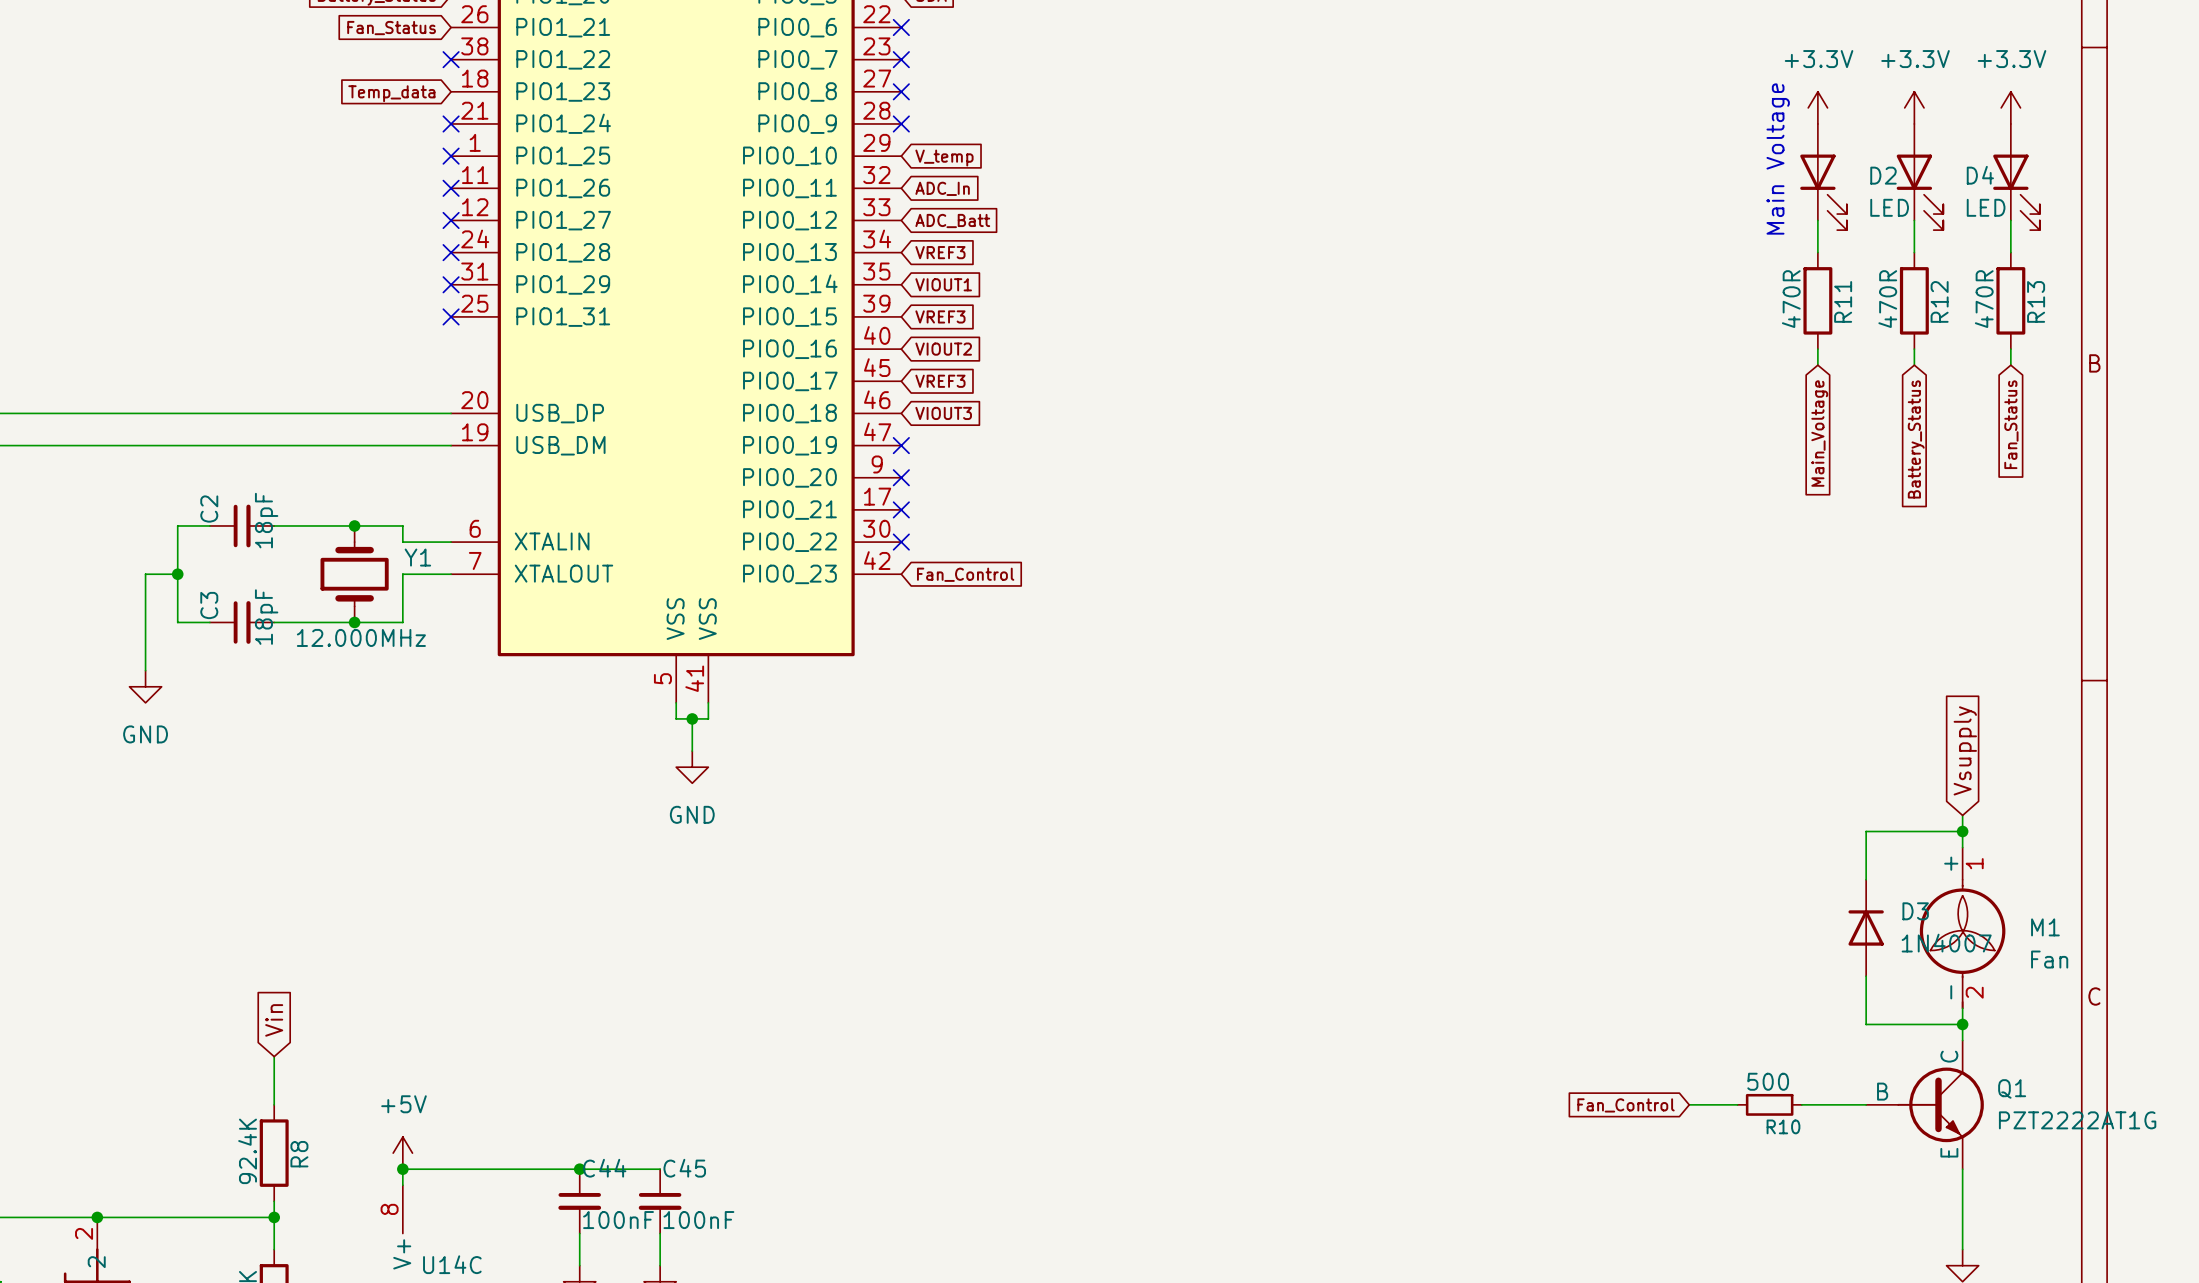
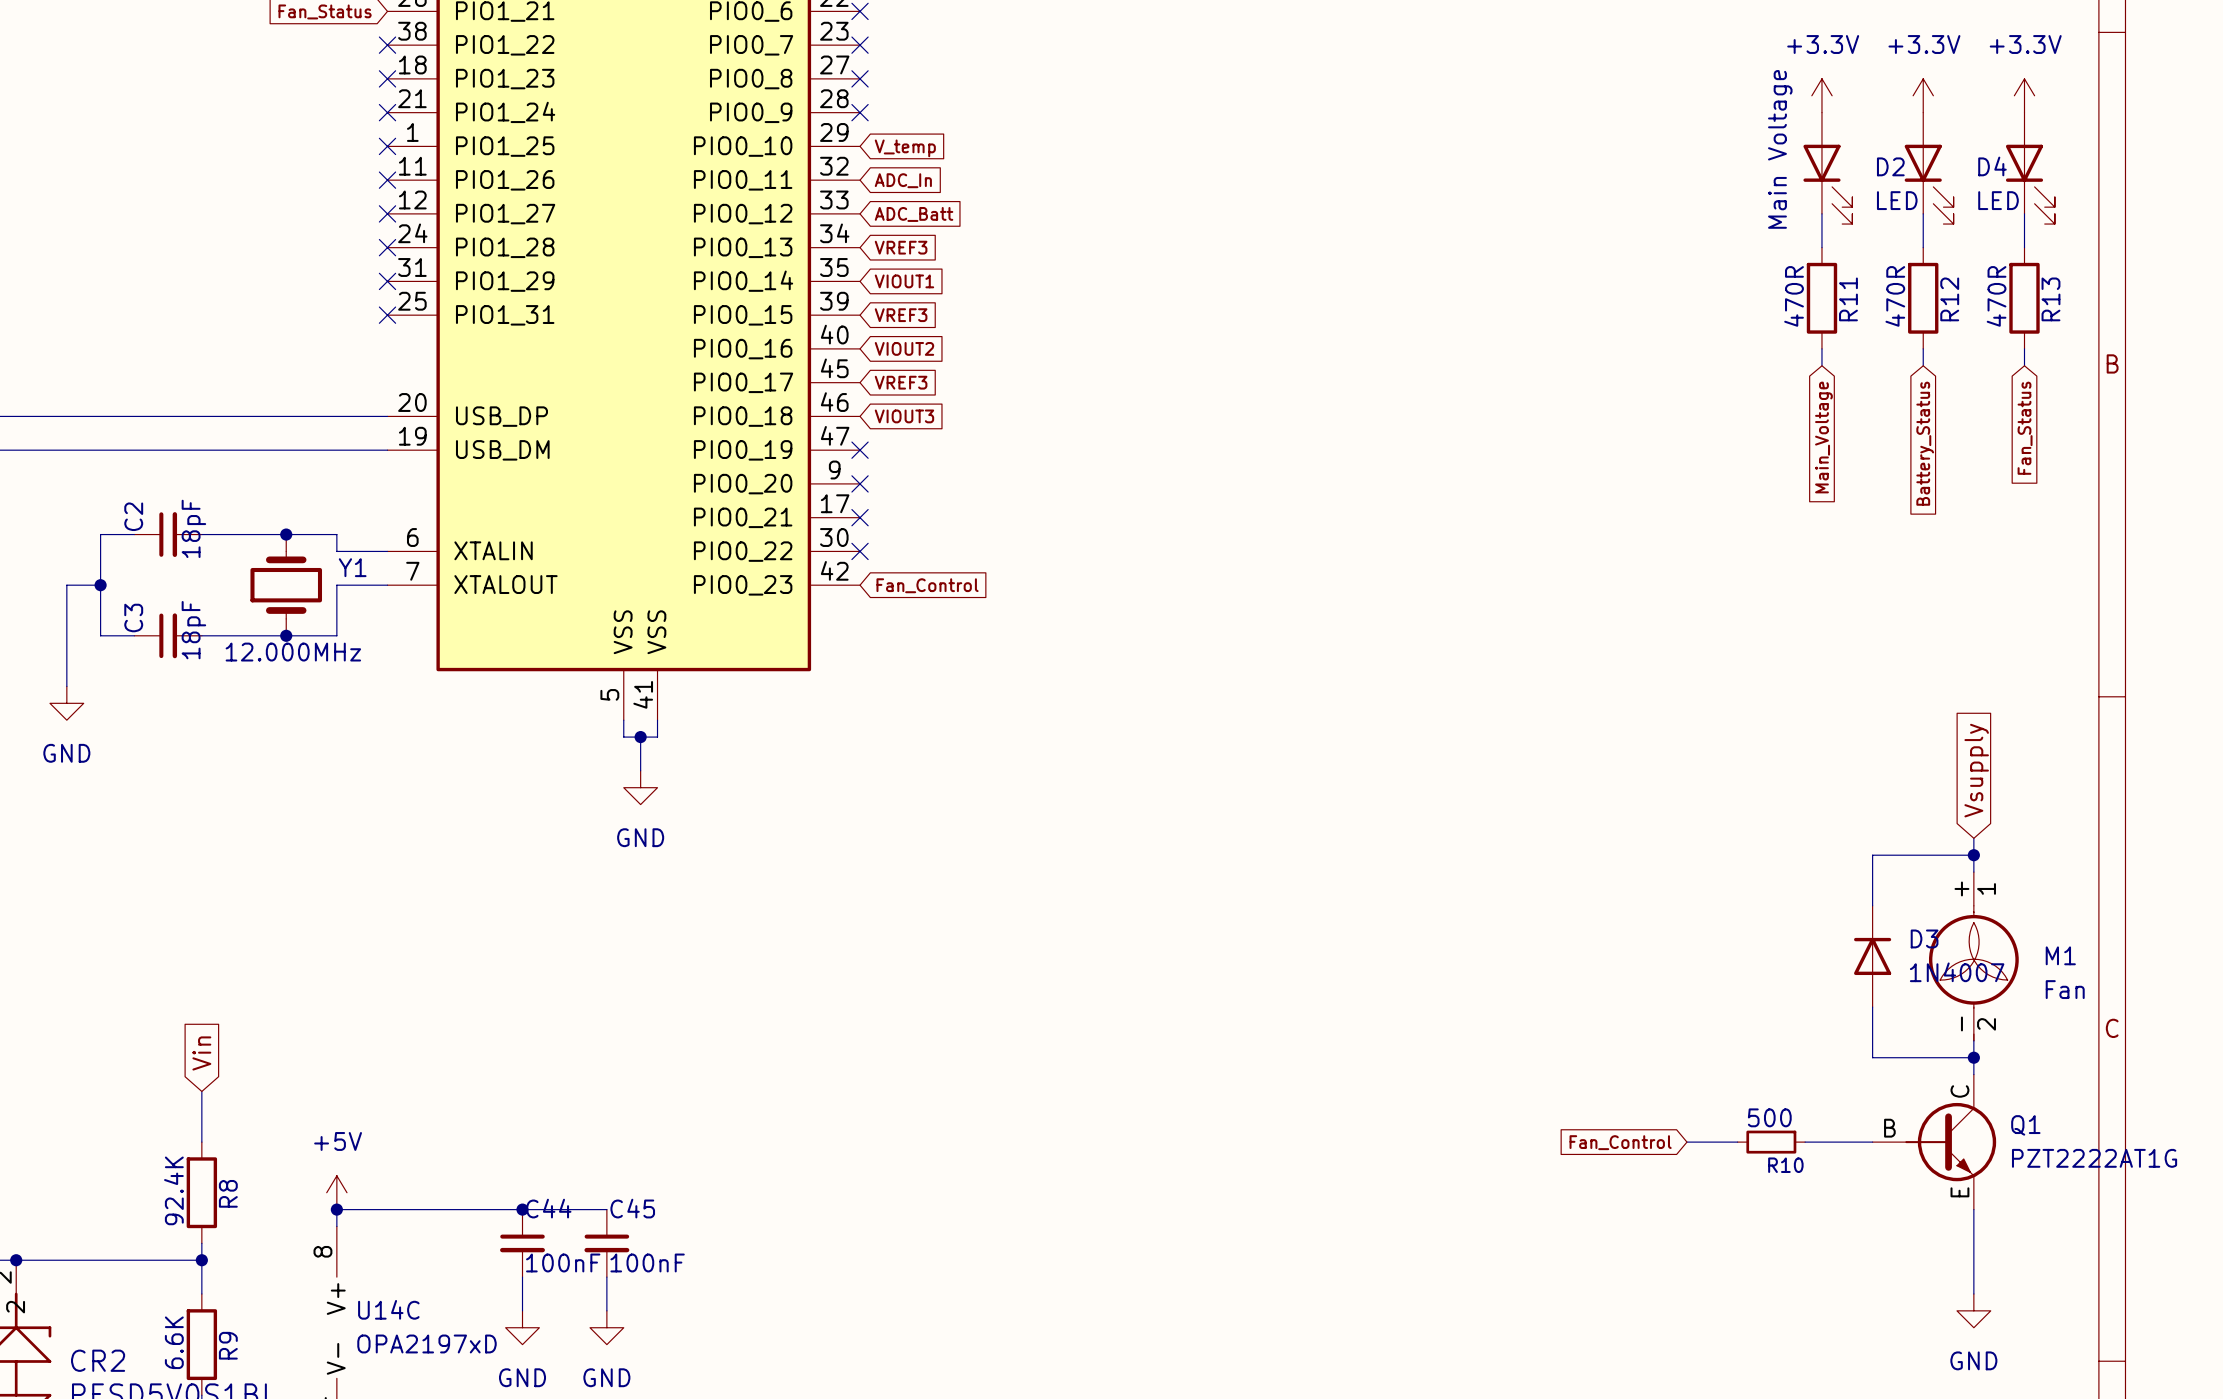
no-connect mark: none -> (387, 78)
global label: Temp_data (391, 93) -> none

